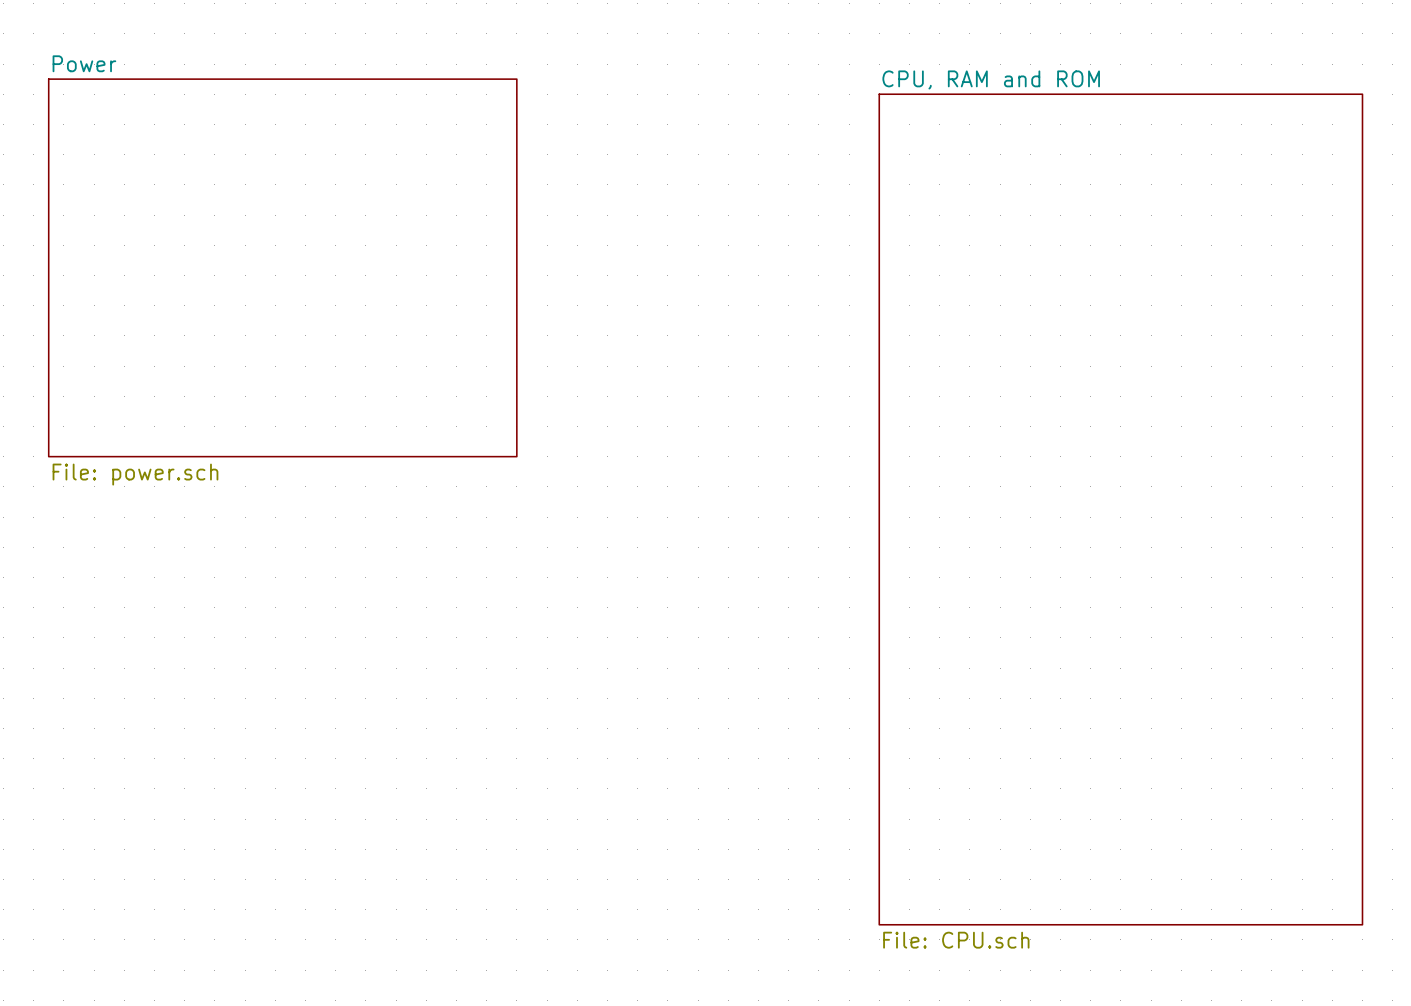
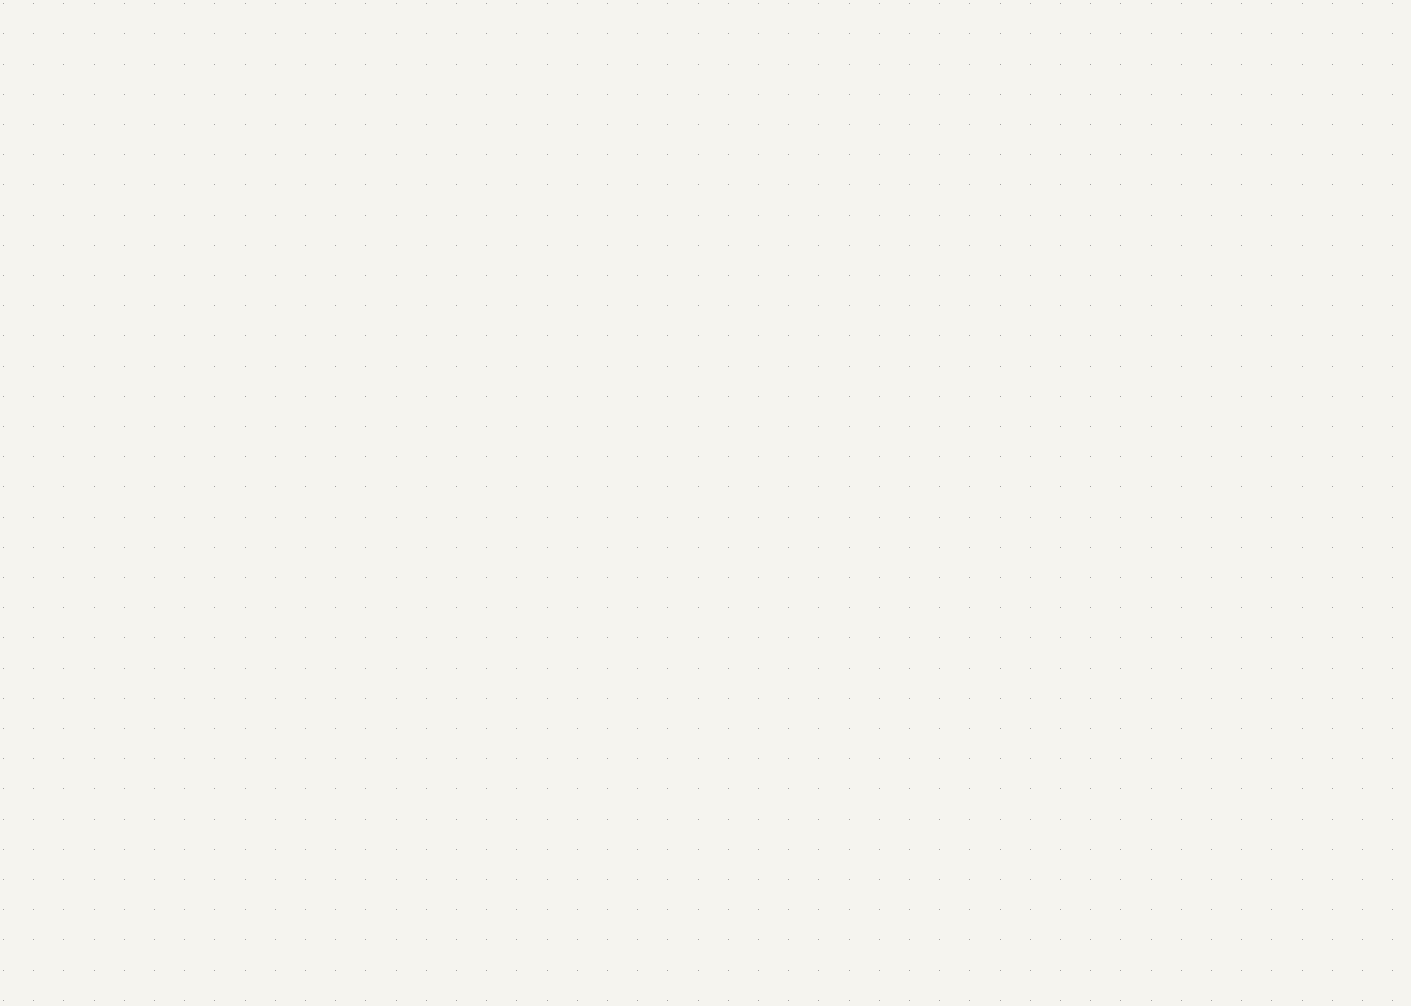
sheet Power: File: power.sch (282, 267) -> none
sheet CPU, RAM and ROM: File: CPU.sch (1120, 509) -> none

